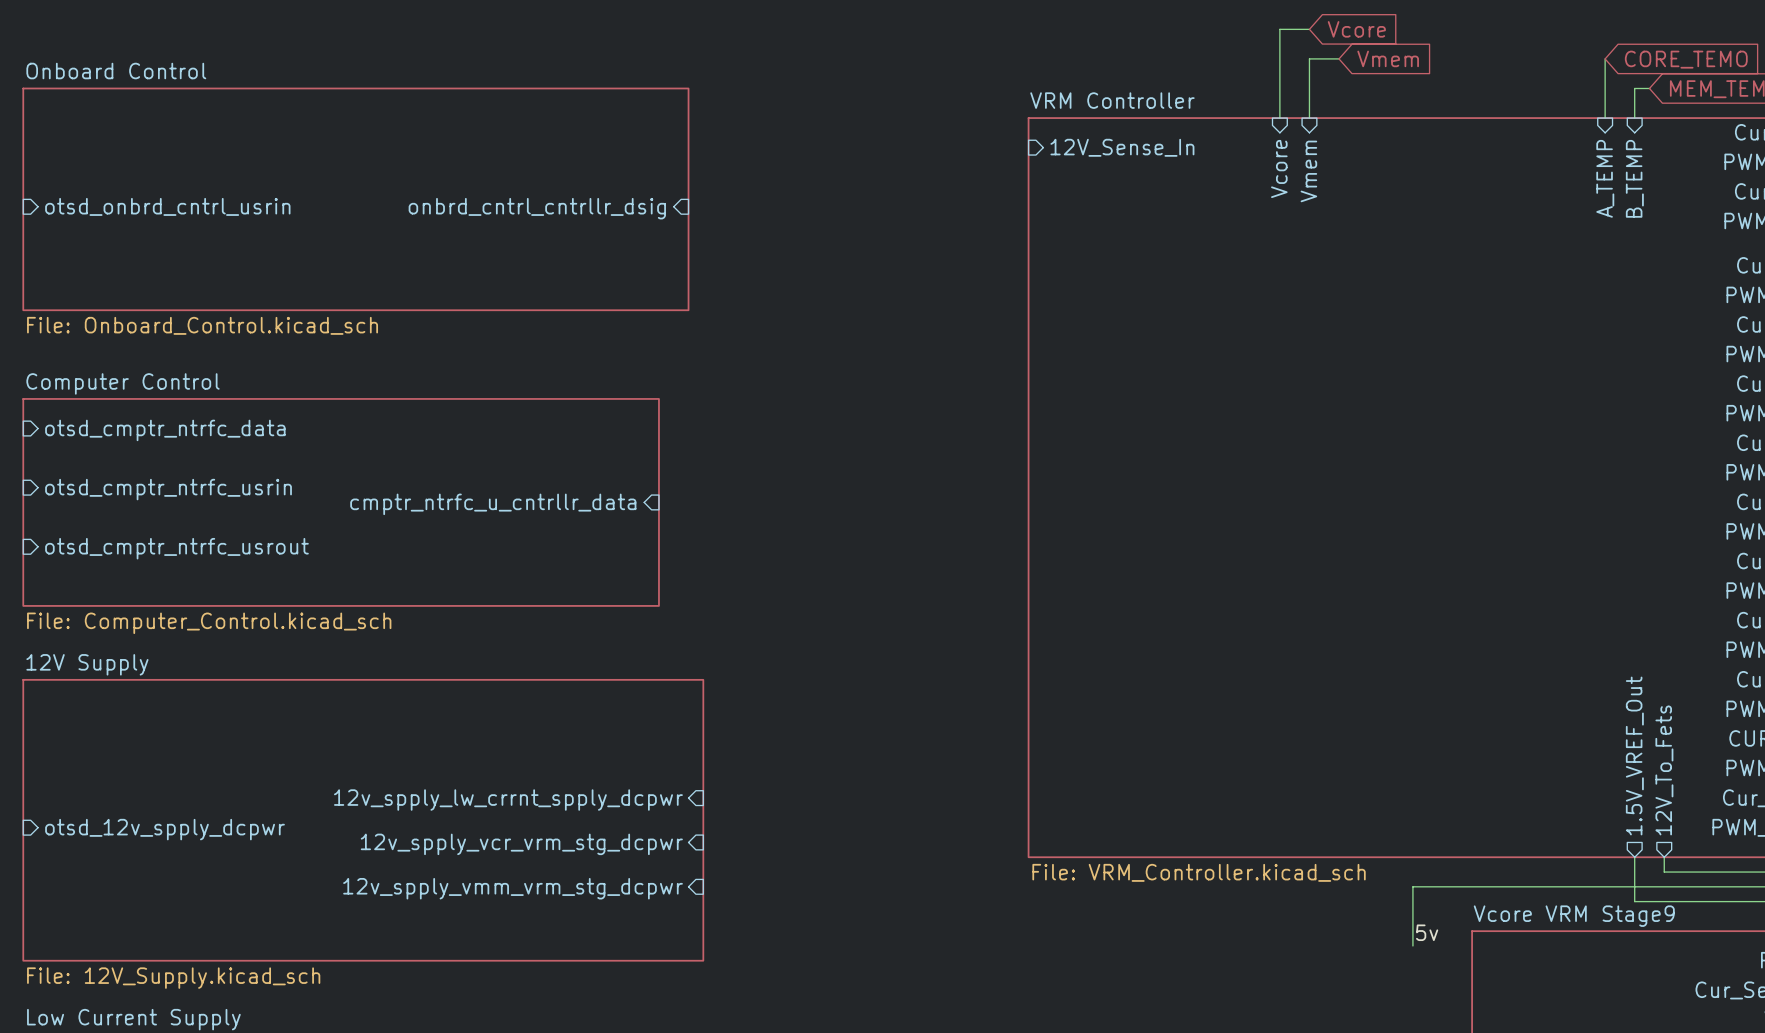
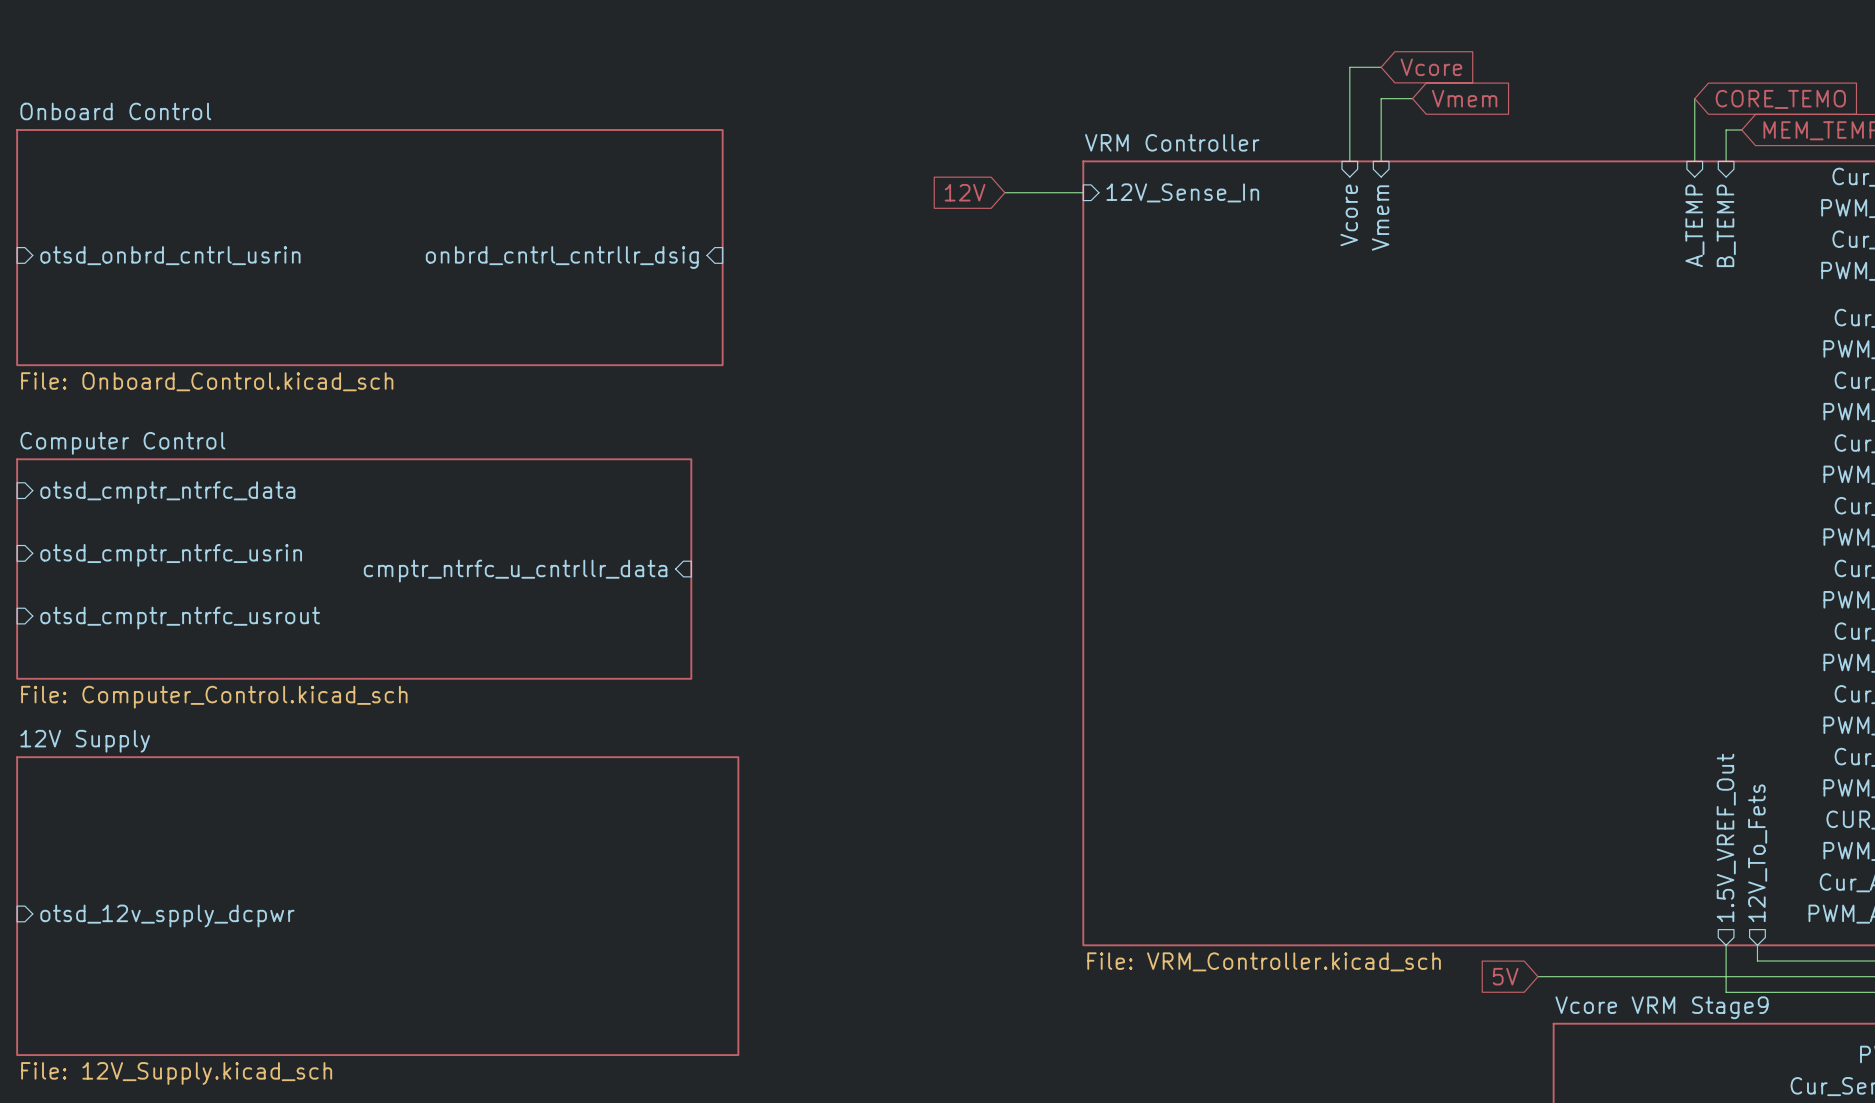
global label: none -> 12V (965, 192)
wire: none -> (1004, 192) (1083, 192)
sheet pin: 12v_spply_lw_crrnt_spply_dcpwr (508, 800) -> none
sheet pin: 12v_spply_vcr_vrm_stg_dcpwr (521, 844) -> none
global label: none -> 5V (1505, 976)
wire: (1457, 886) (1412, 886) (1412, 945) -> none
sheet pin: 12v_spply_vmm_vrm_stg_dcpwr (513, 888) -> none
label: 5v (1427, 932) -> none

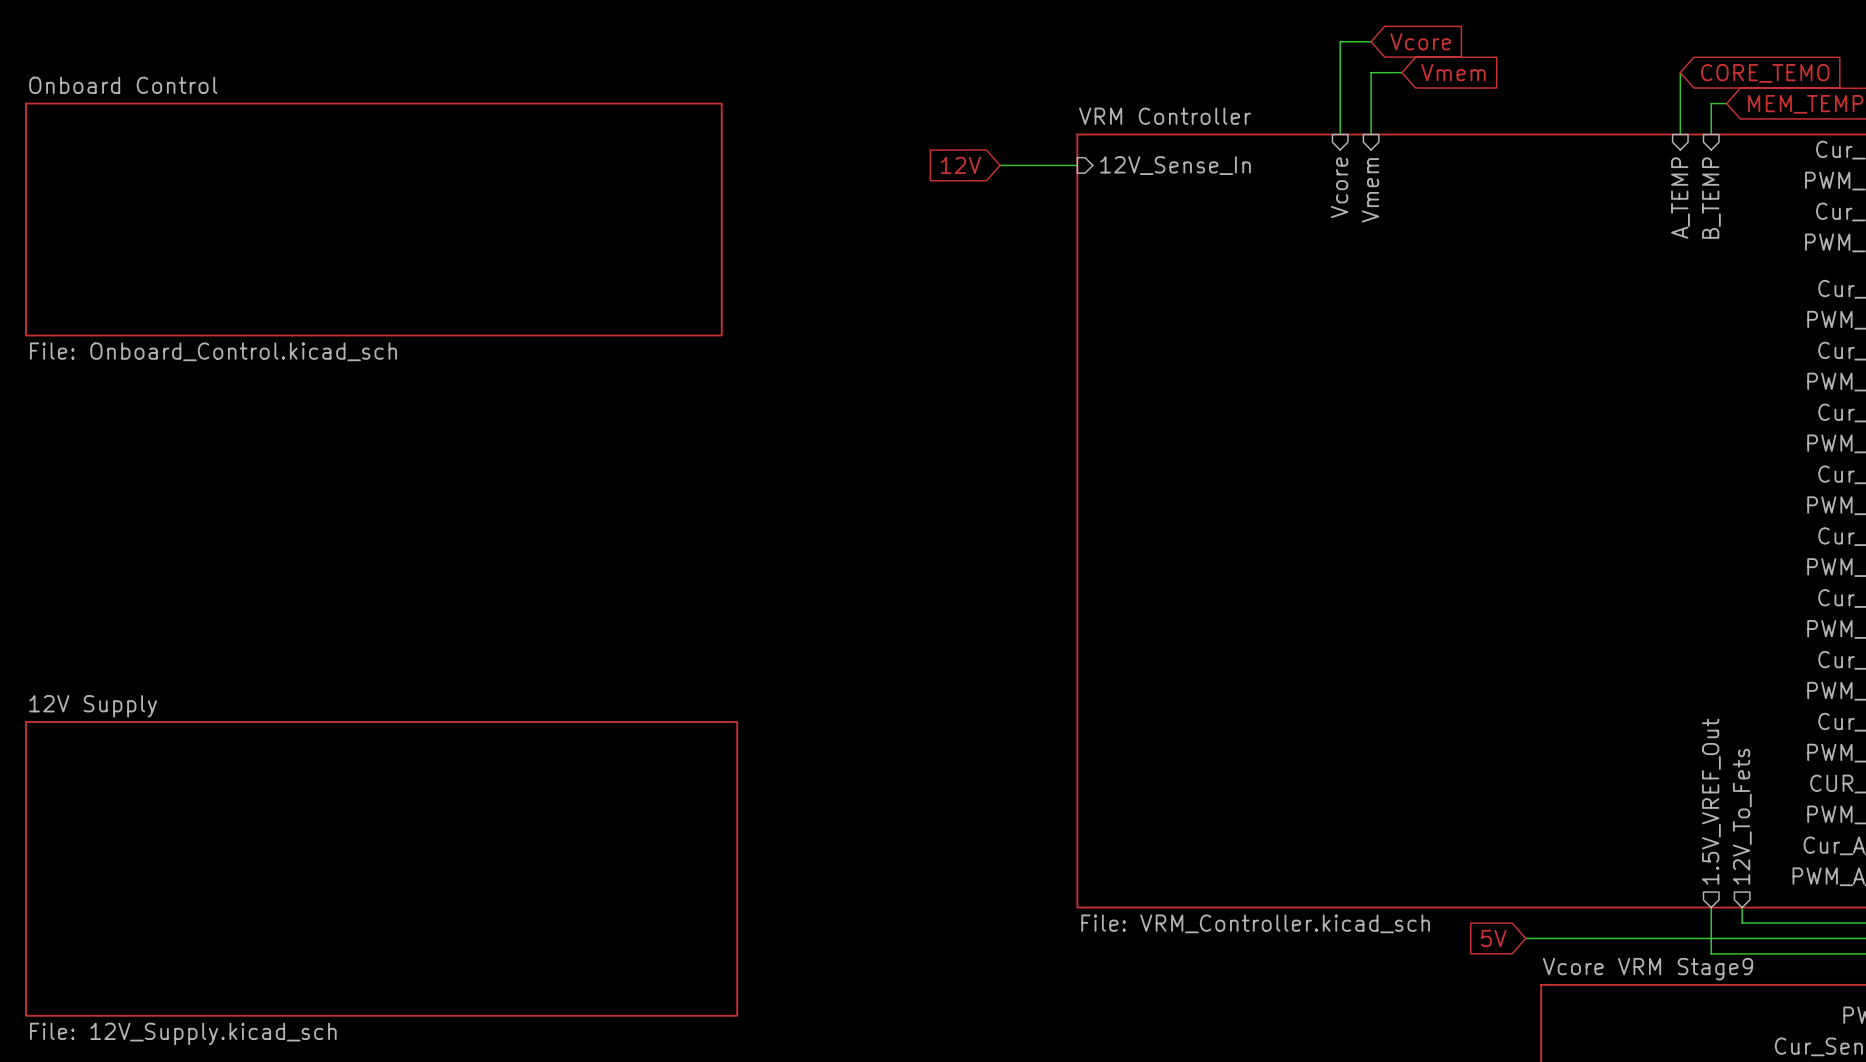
sheet pin: otsd_onbrd_cntrl_usrin (170, 255) -> none
sheet pin: onbrd_cntrl_cntrllr_dsig (562, 257) -> none
sheet pin: otsd_cmptr_ntrfc_data (167, 492) -> none
sheet pin: otsd_cmptr_ntrfc_usrin (171, 555) -> none
sheet Computer Control: File: Computer_Control.kicad_sch (354, 569) -> none
sheet pin: cmptr_ntrfc_u_cntrllr_data (515, 571) -> none
sheet pin: otsd_cmptr_ntrfc_usrout (180, 618) -> none
sheet pin: otsd_12v_spply_dcpwr (167, 915) -> none

